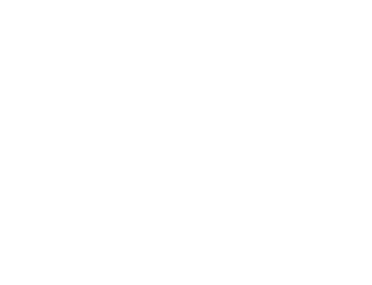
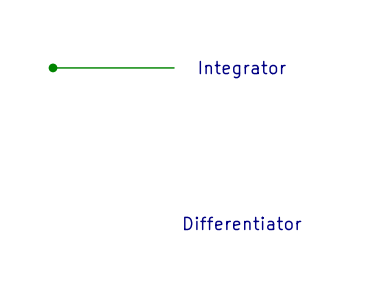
wire: none -> (53, 67) (174, 67)
junction: none -> (53, 67)
text: none -> Integrator (242, 69)
text: none -> Differentiator (242, 223)

